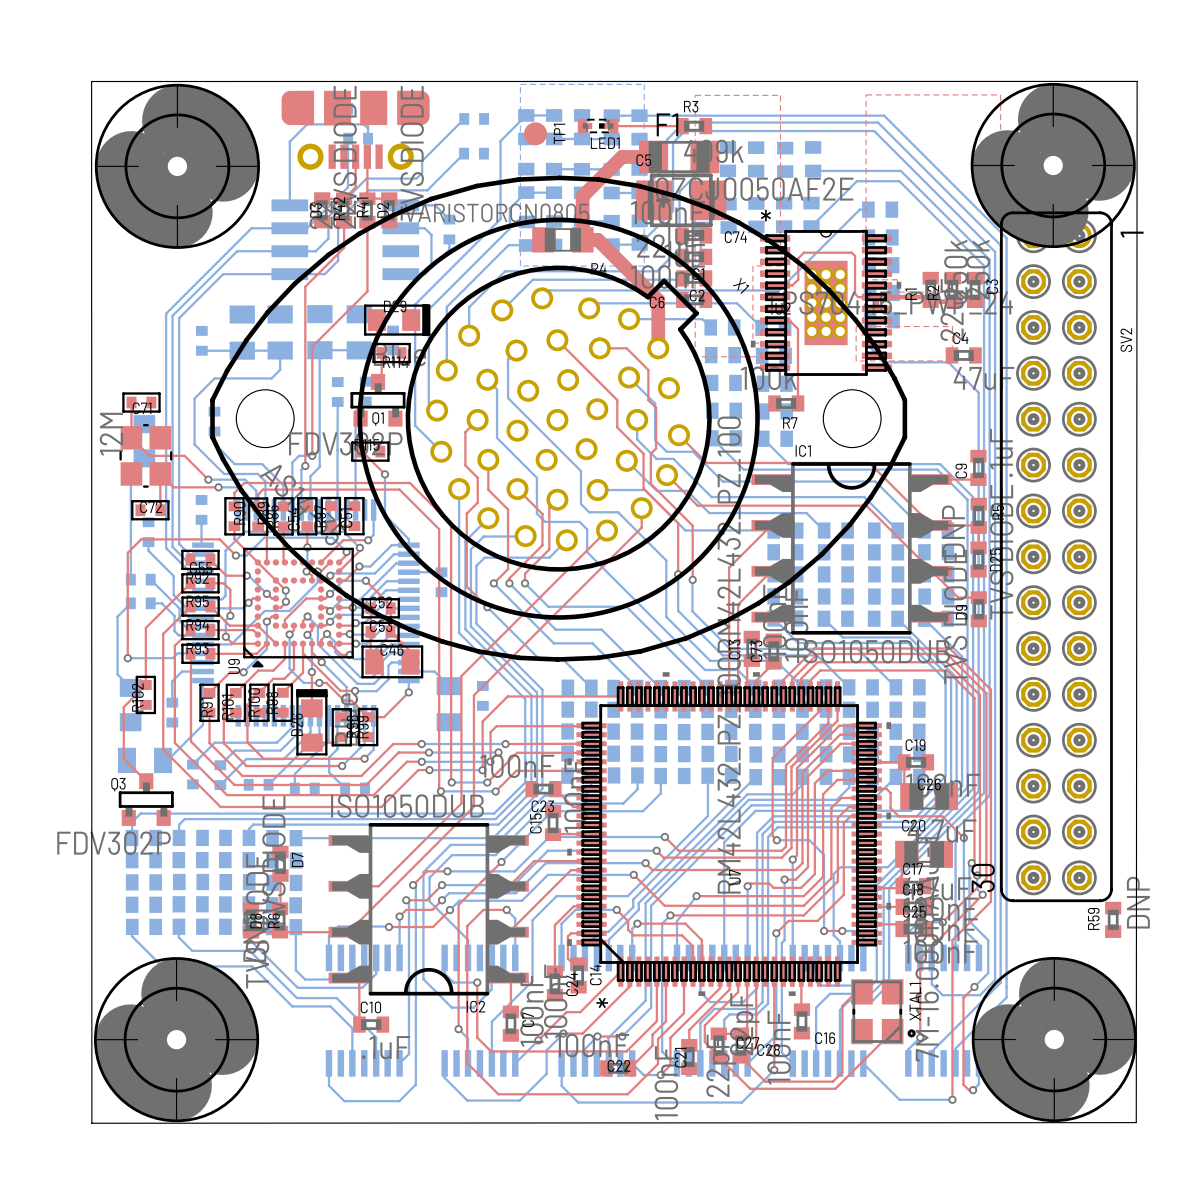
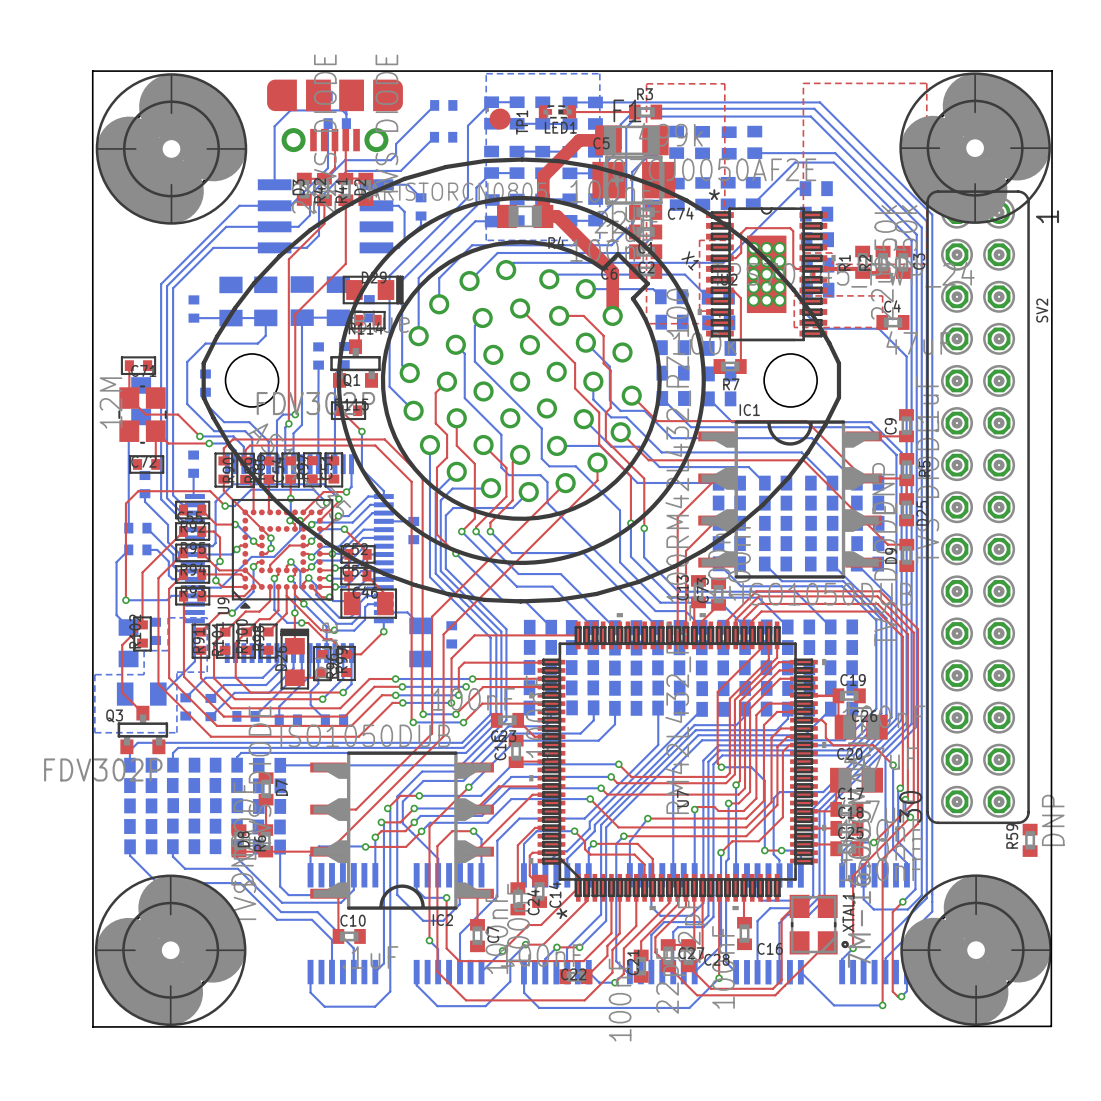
bottom track: (202, 671) (182, 671) (172, 681) (172, 702) -> none
bottom zone outline: none -> (168, 617) (207, 617) (207, 672) (176, 672) (176, 732) (94, 732) (94, 674) (144, 674) (144, 650) (168, 650) (168, 617)
part position: (172, 712) -> (155, 631)

